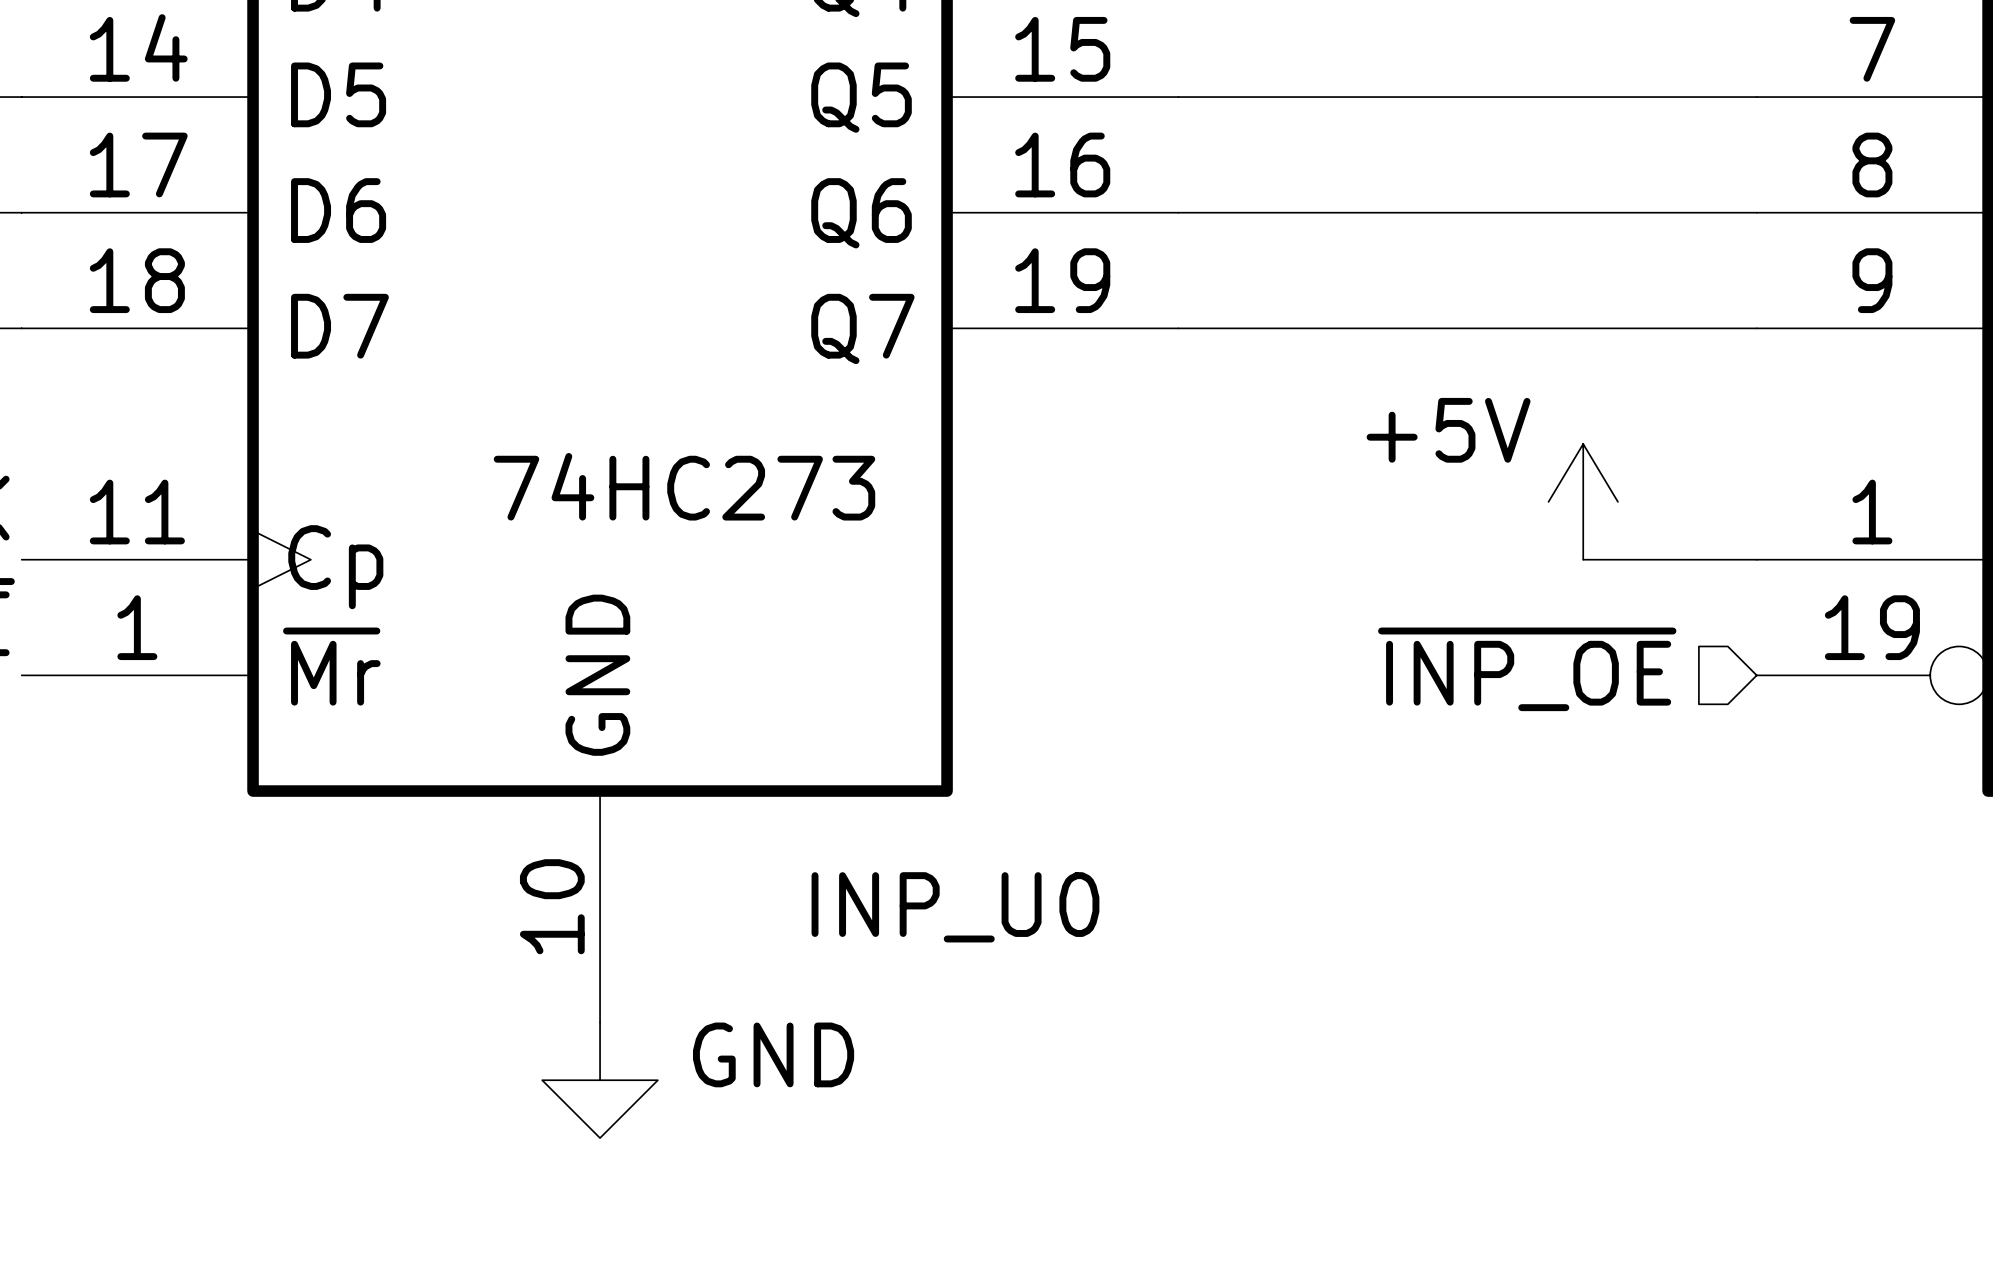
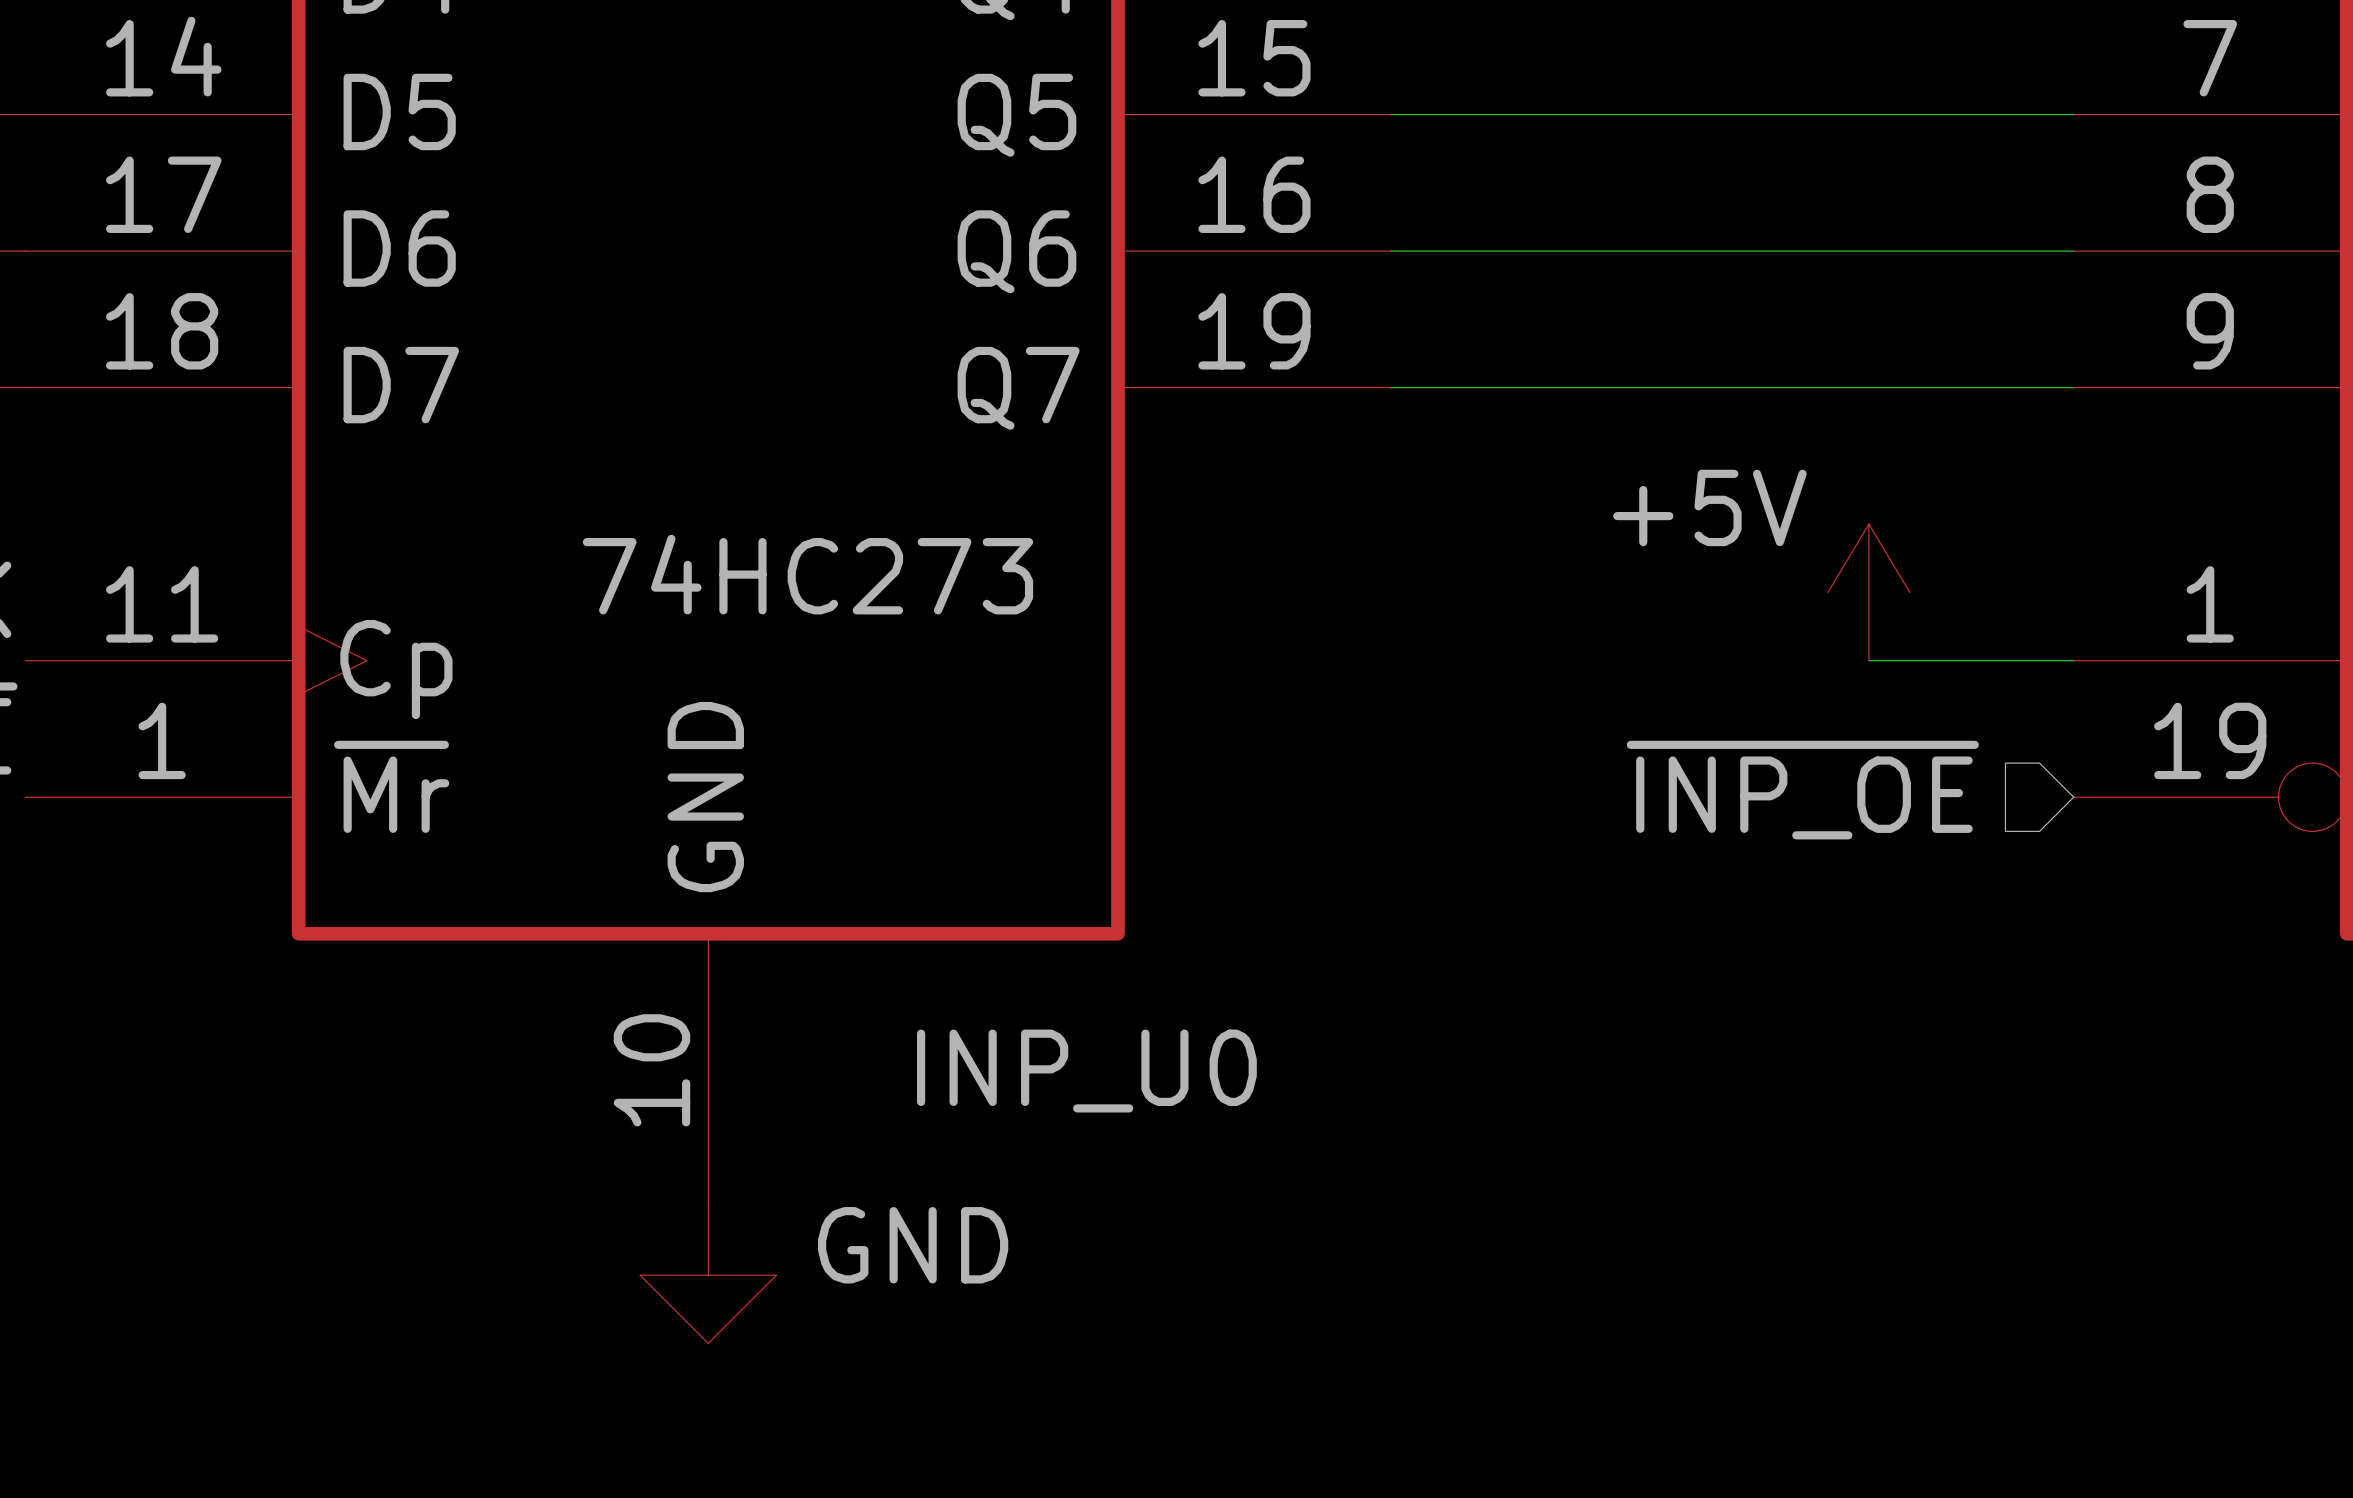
INP_U0 name position: INP_U0 (955, 907) -> INP_U0 (1086, 1071)

